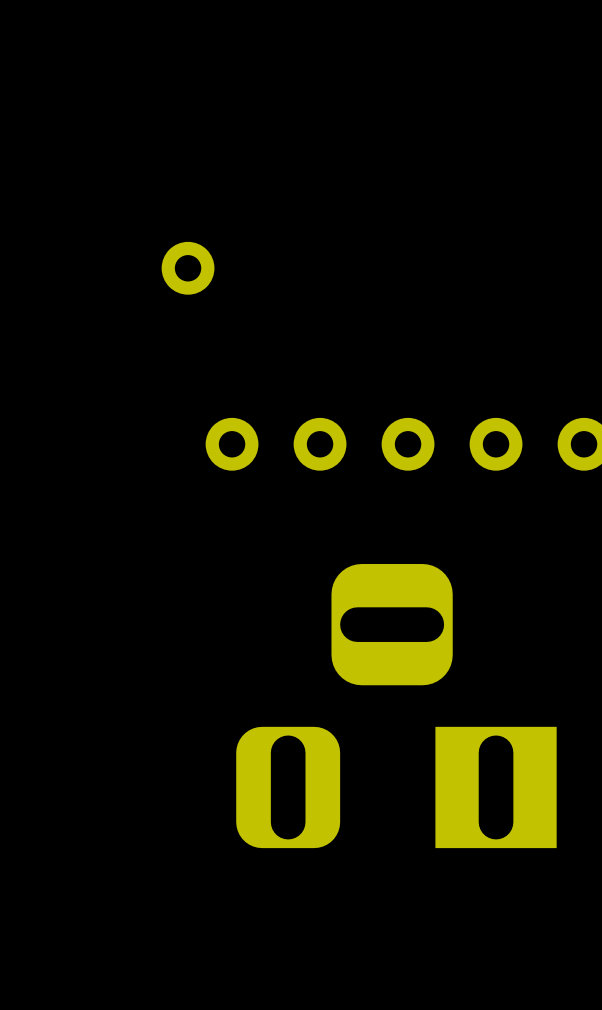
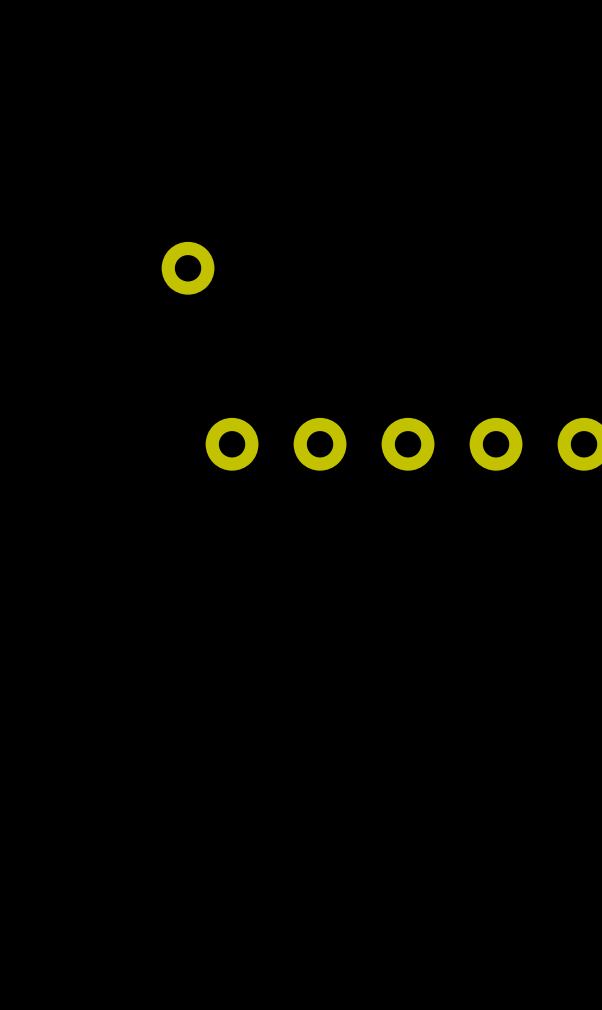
part: (396, 706) -> none

